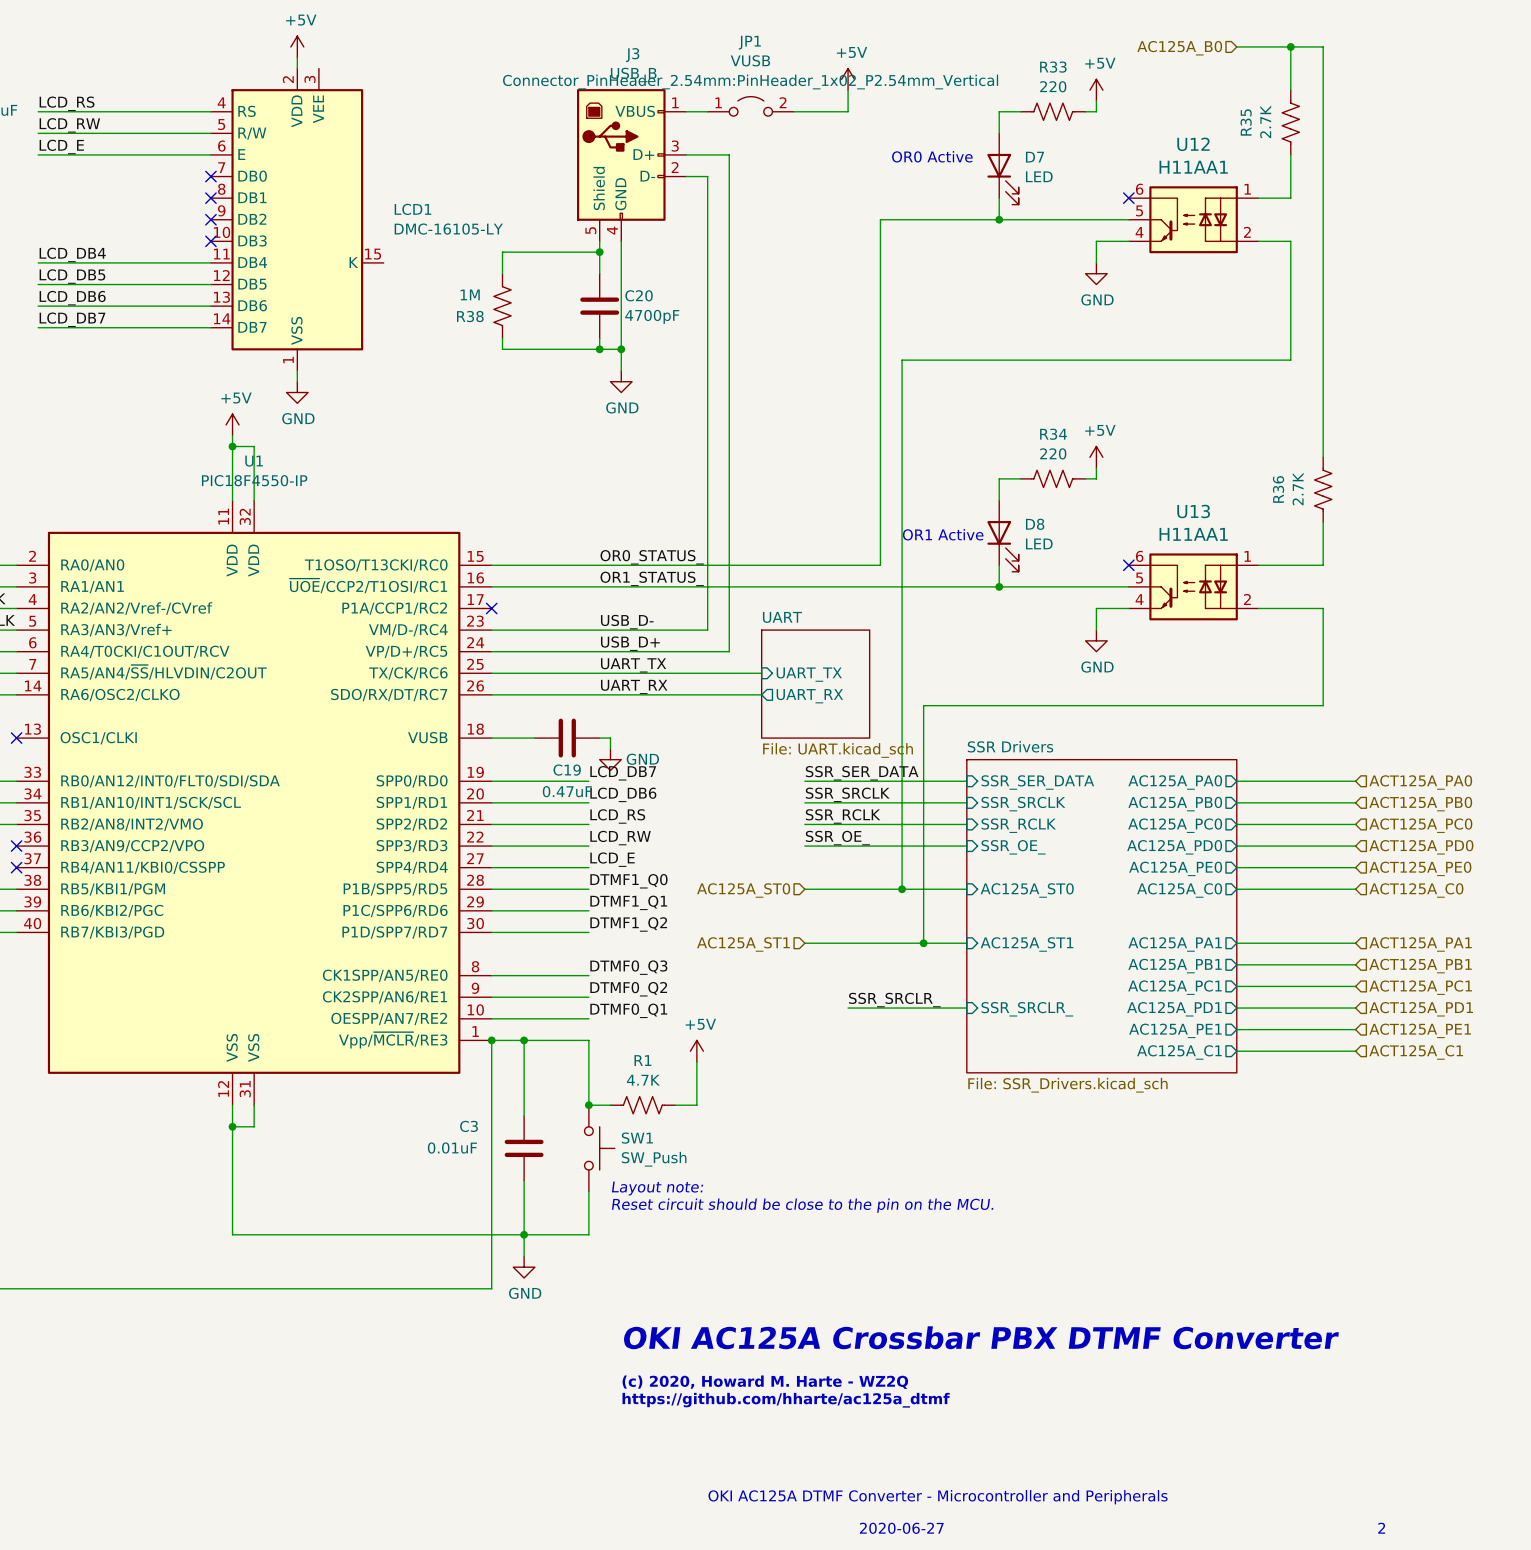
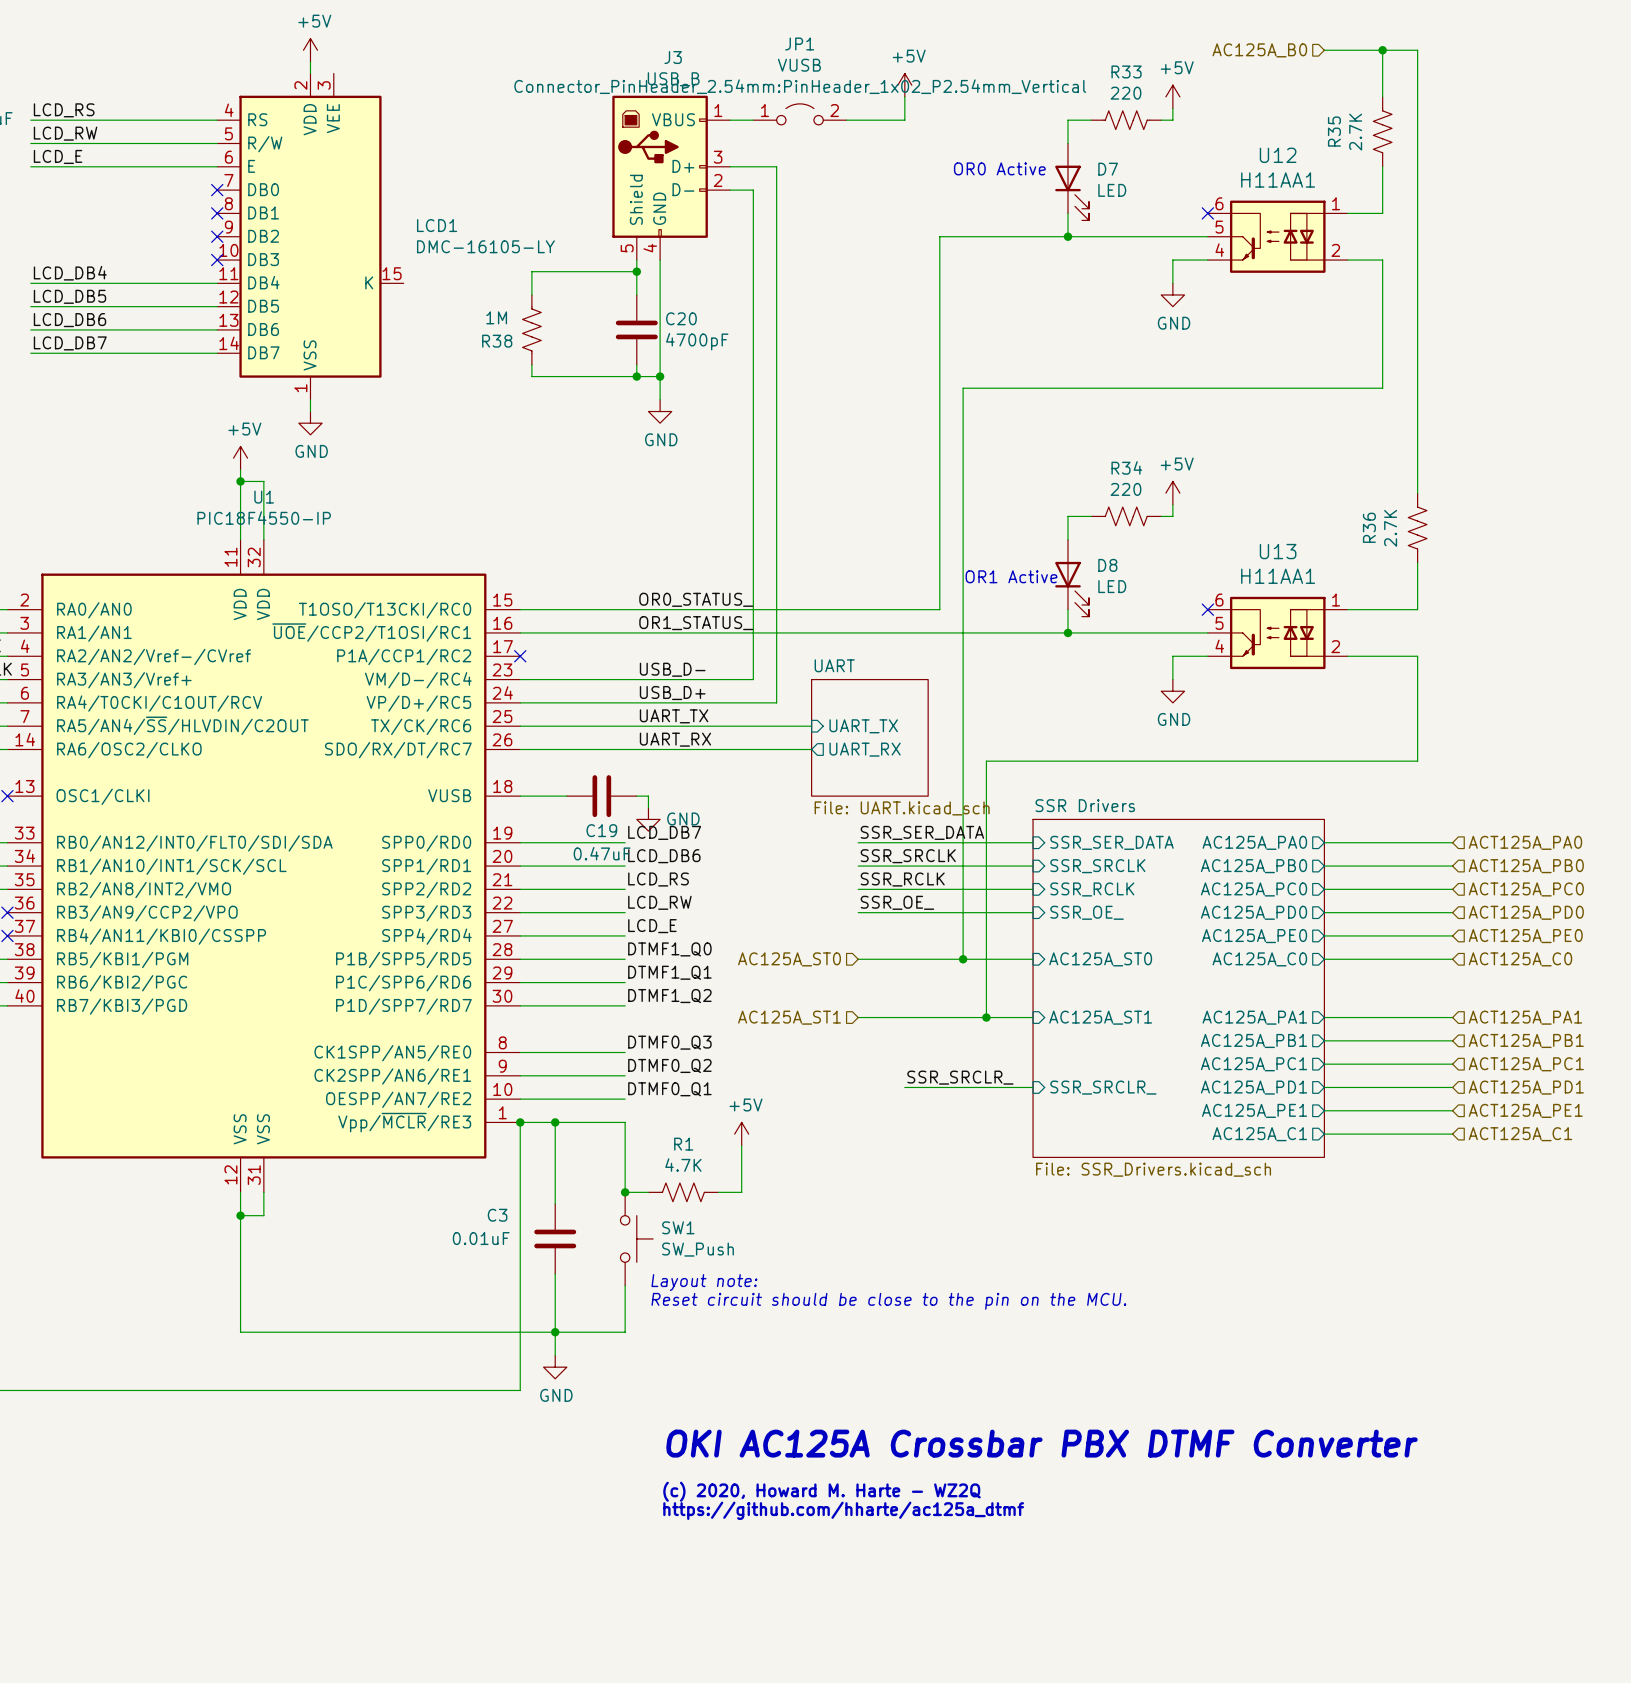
text: OKI AC125A DTMF Converter - Microcontroller and Peripherals (938, 1497) -> none
text: 2020-06-27 (901, 1528) -> none
text: 2 (1381, 1528) -> none

